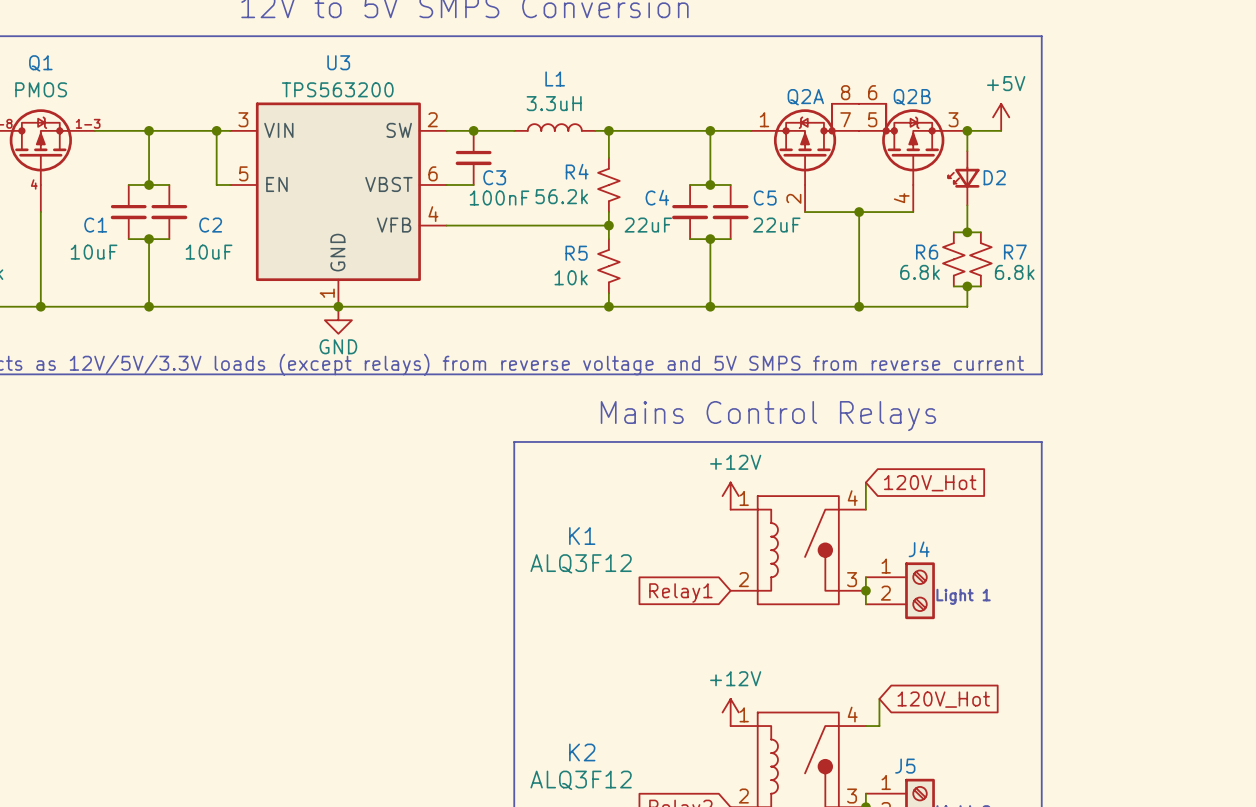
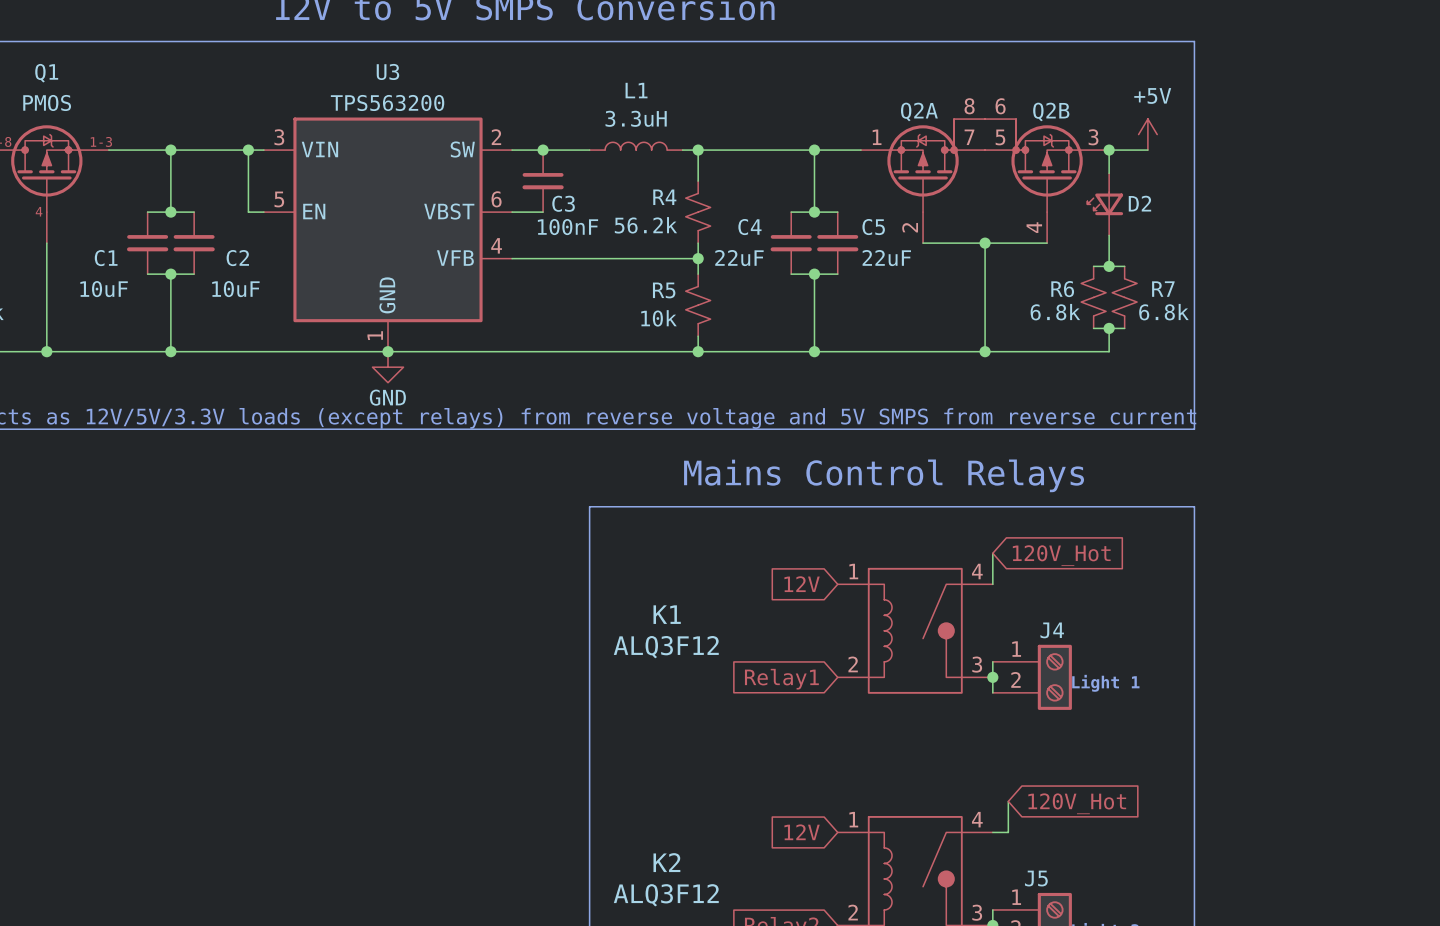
power symbol: +12V (730, 496) -> none
global label: none -> 12V (802, 584)
power symbol: +12V (730, 712) -> none
global label: none -> 12V (802, 832)

